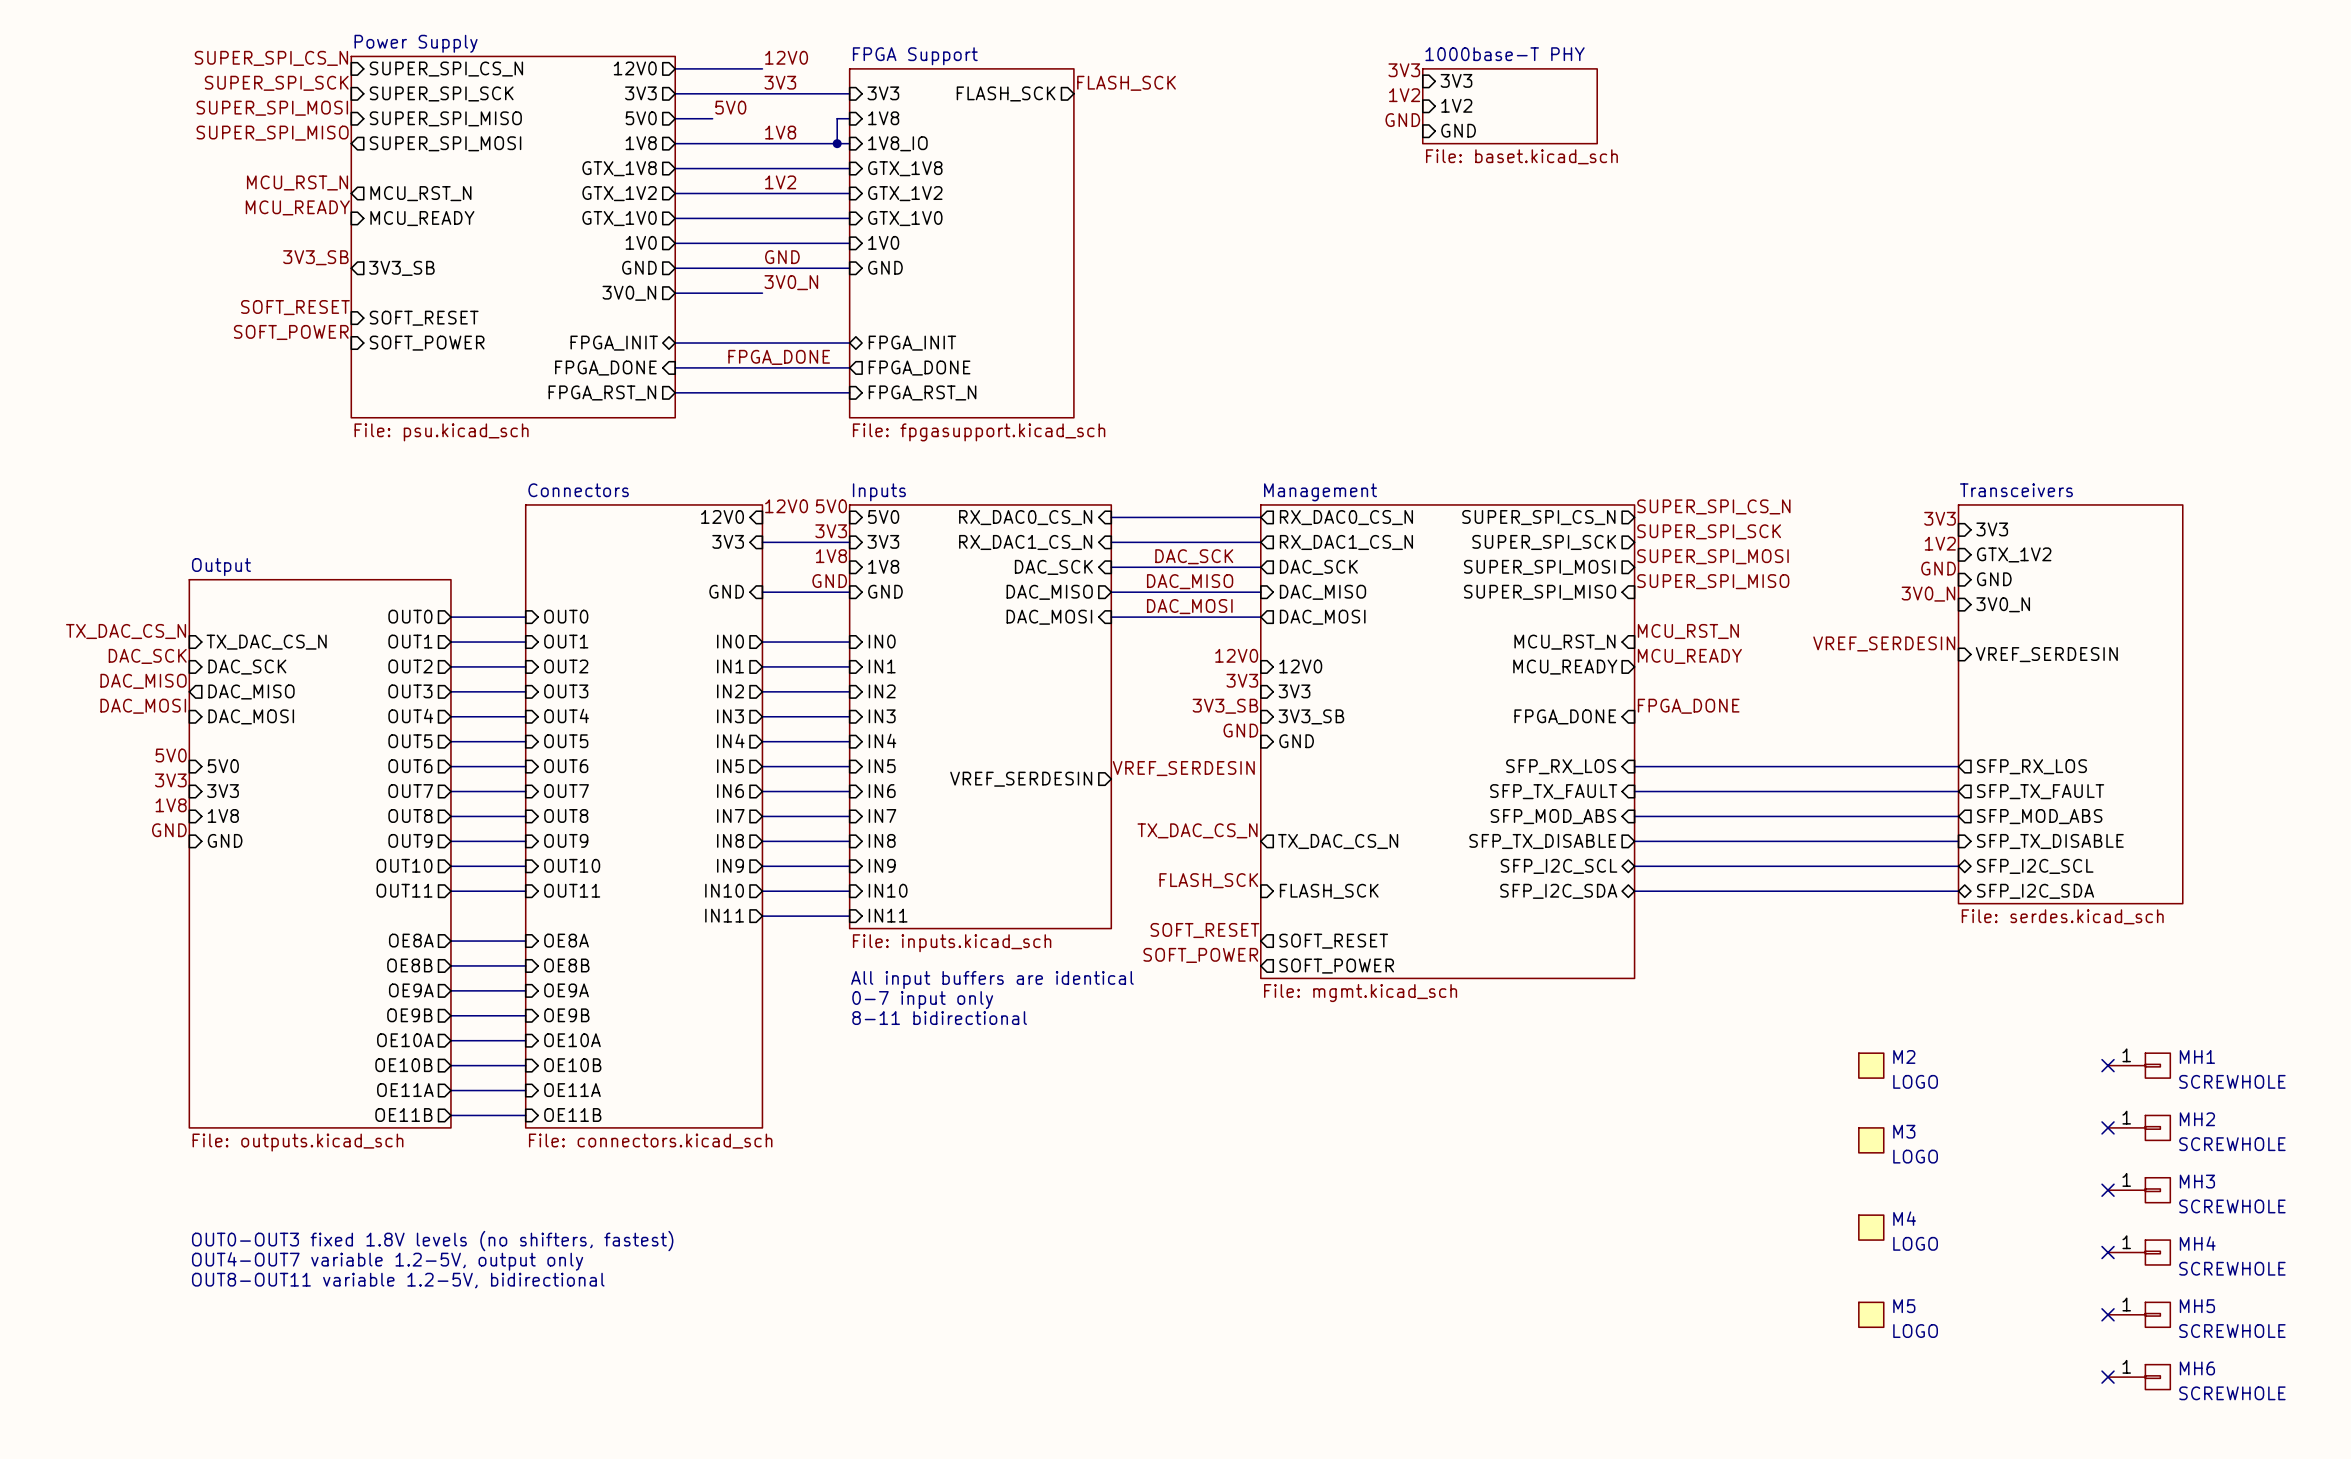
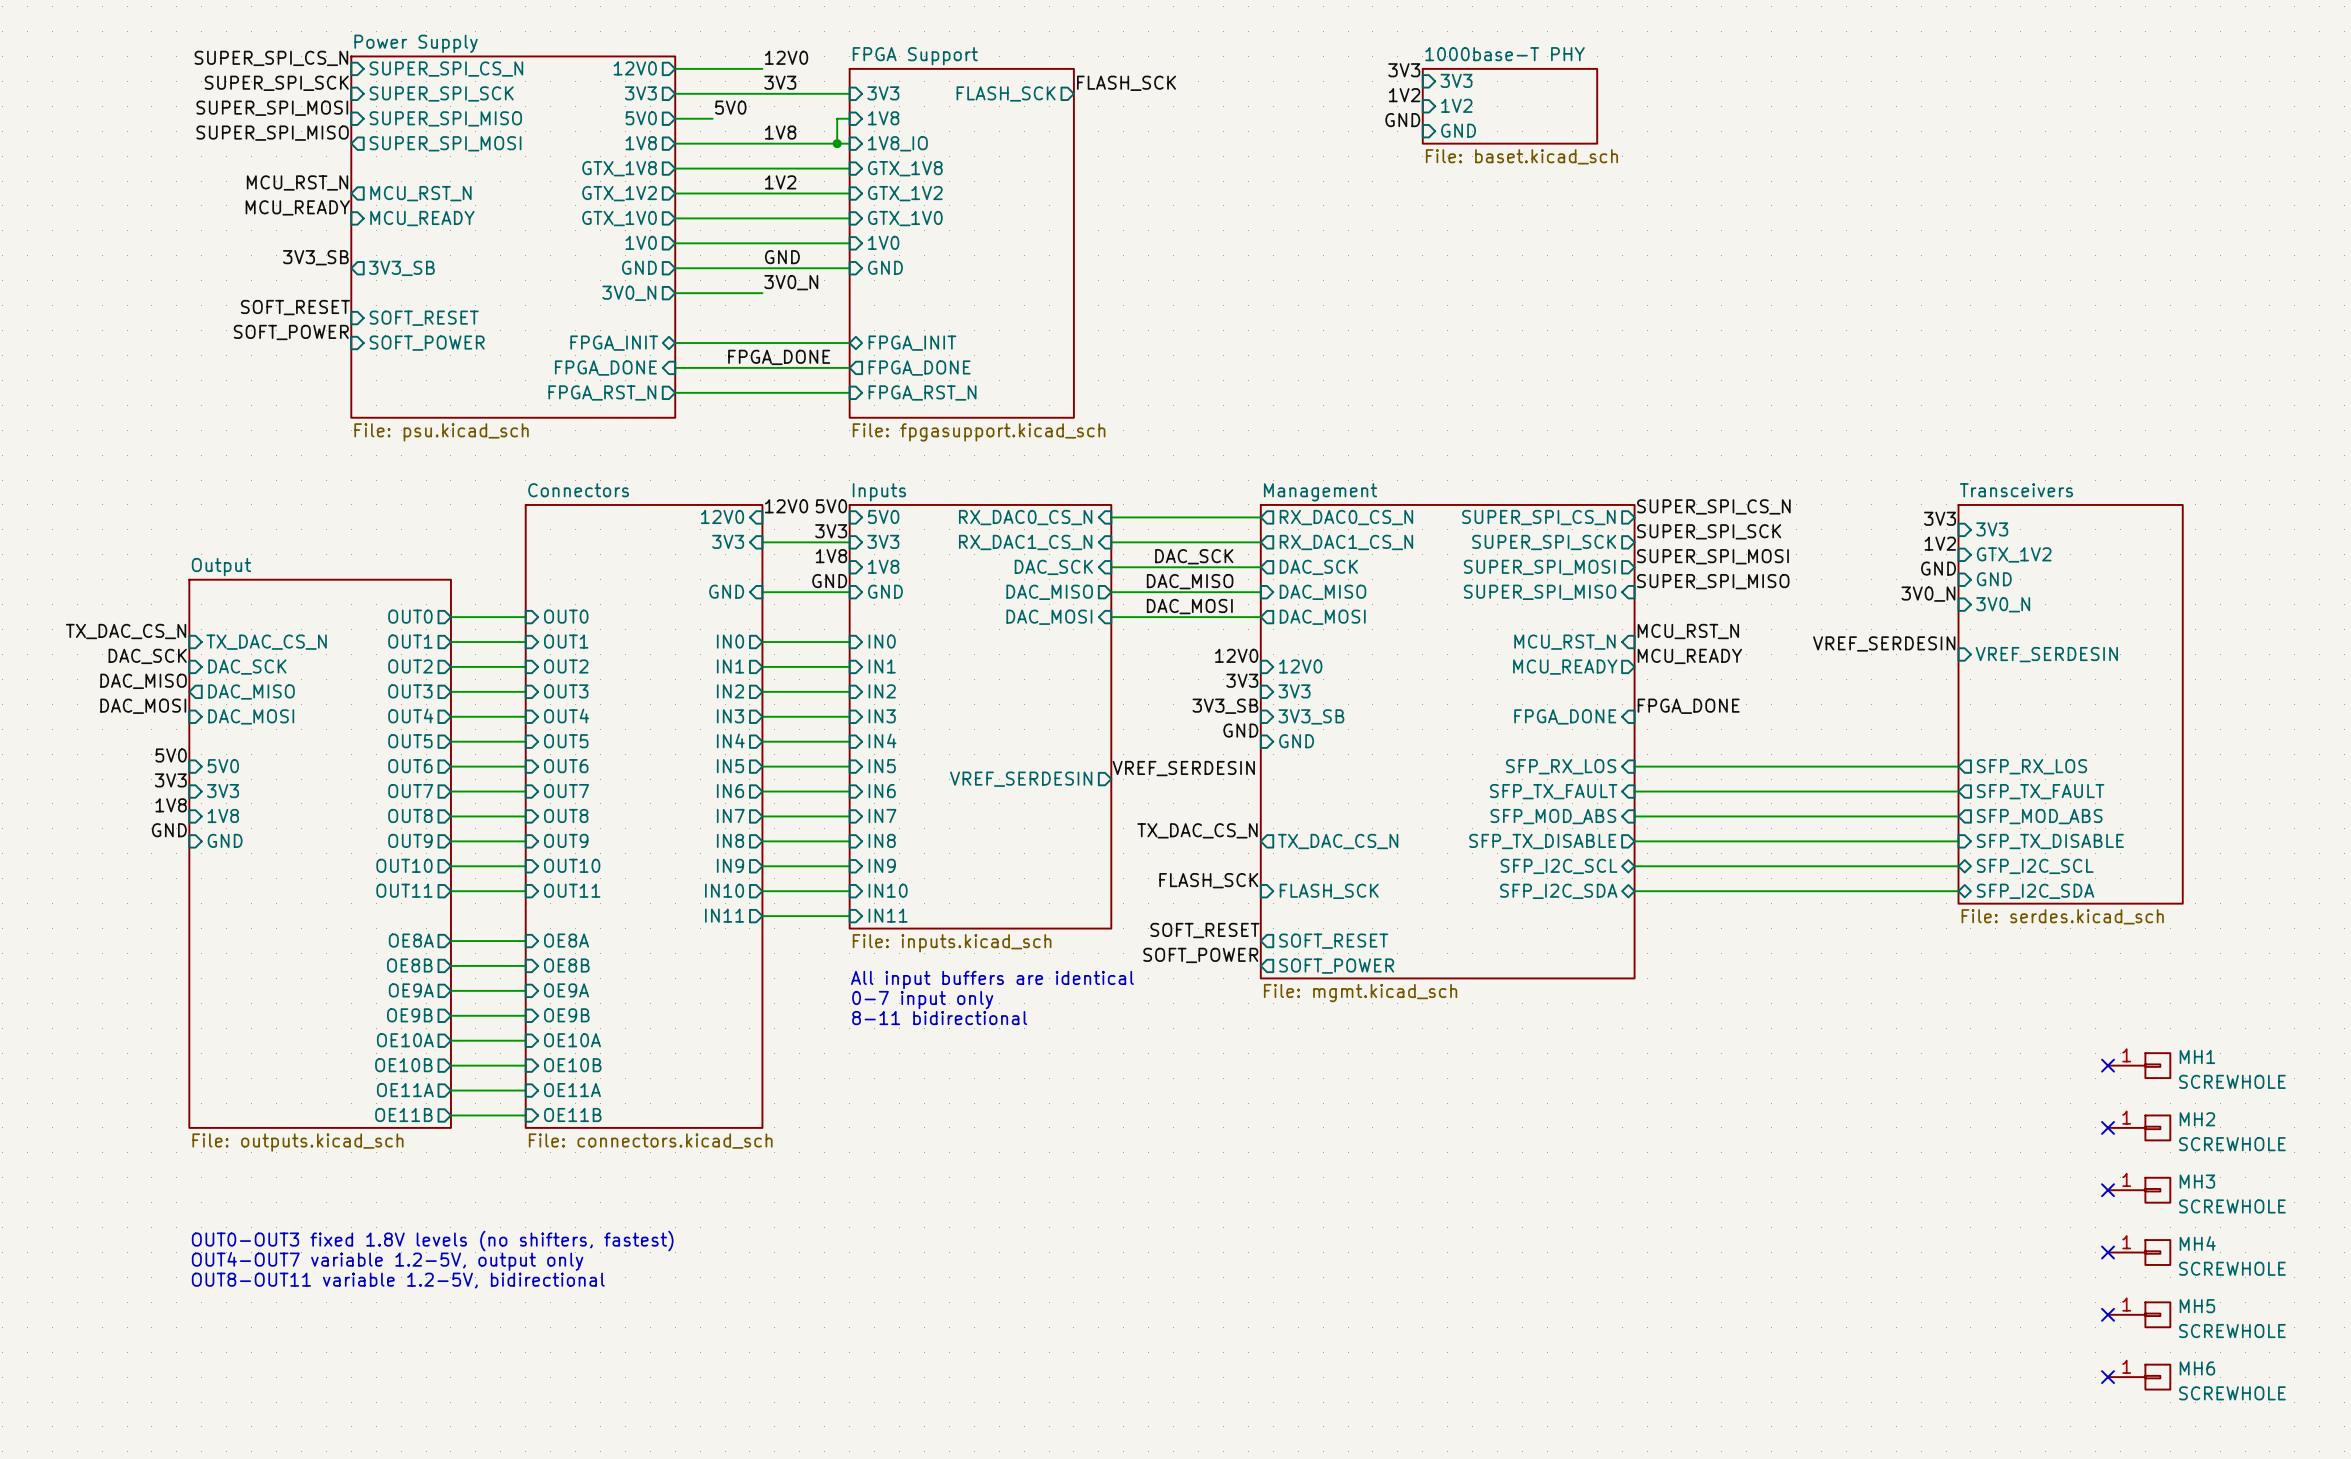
M2: LOGO (1871, 1065) -> none
M3: LOGO (1871, 1140) -> none
M4: LOGO (1871, 1227) -> none
M5: LOGO (1871, 1314) -> none

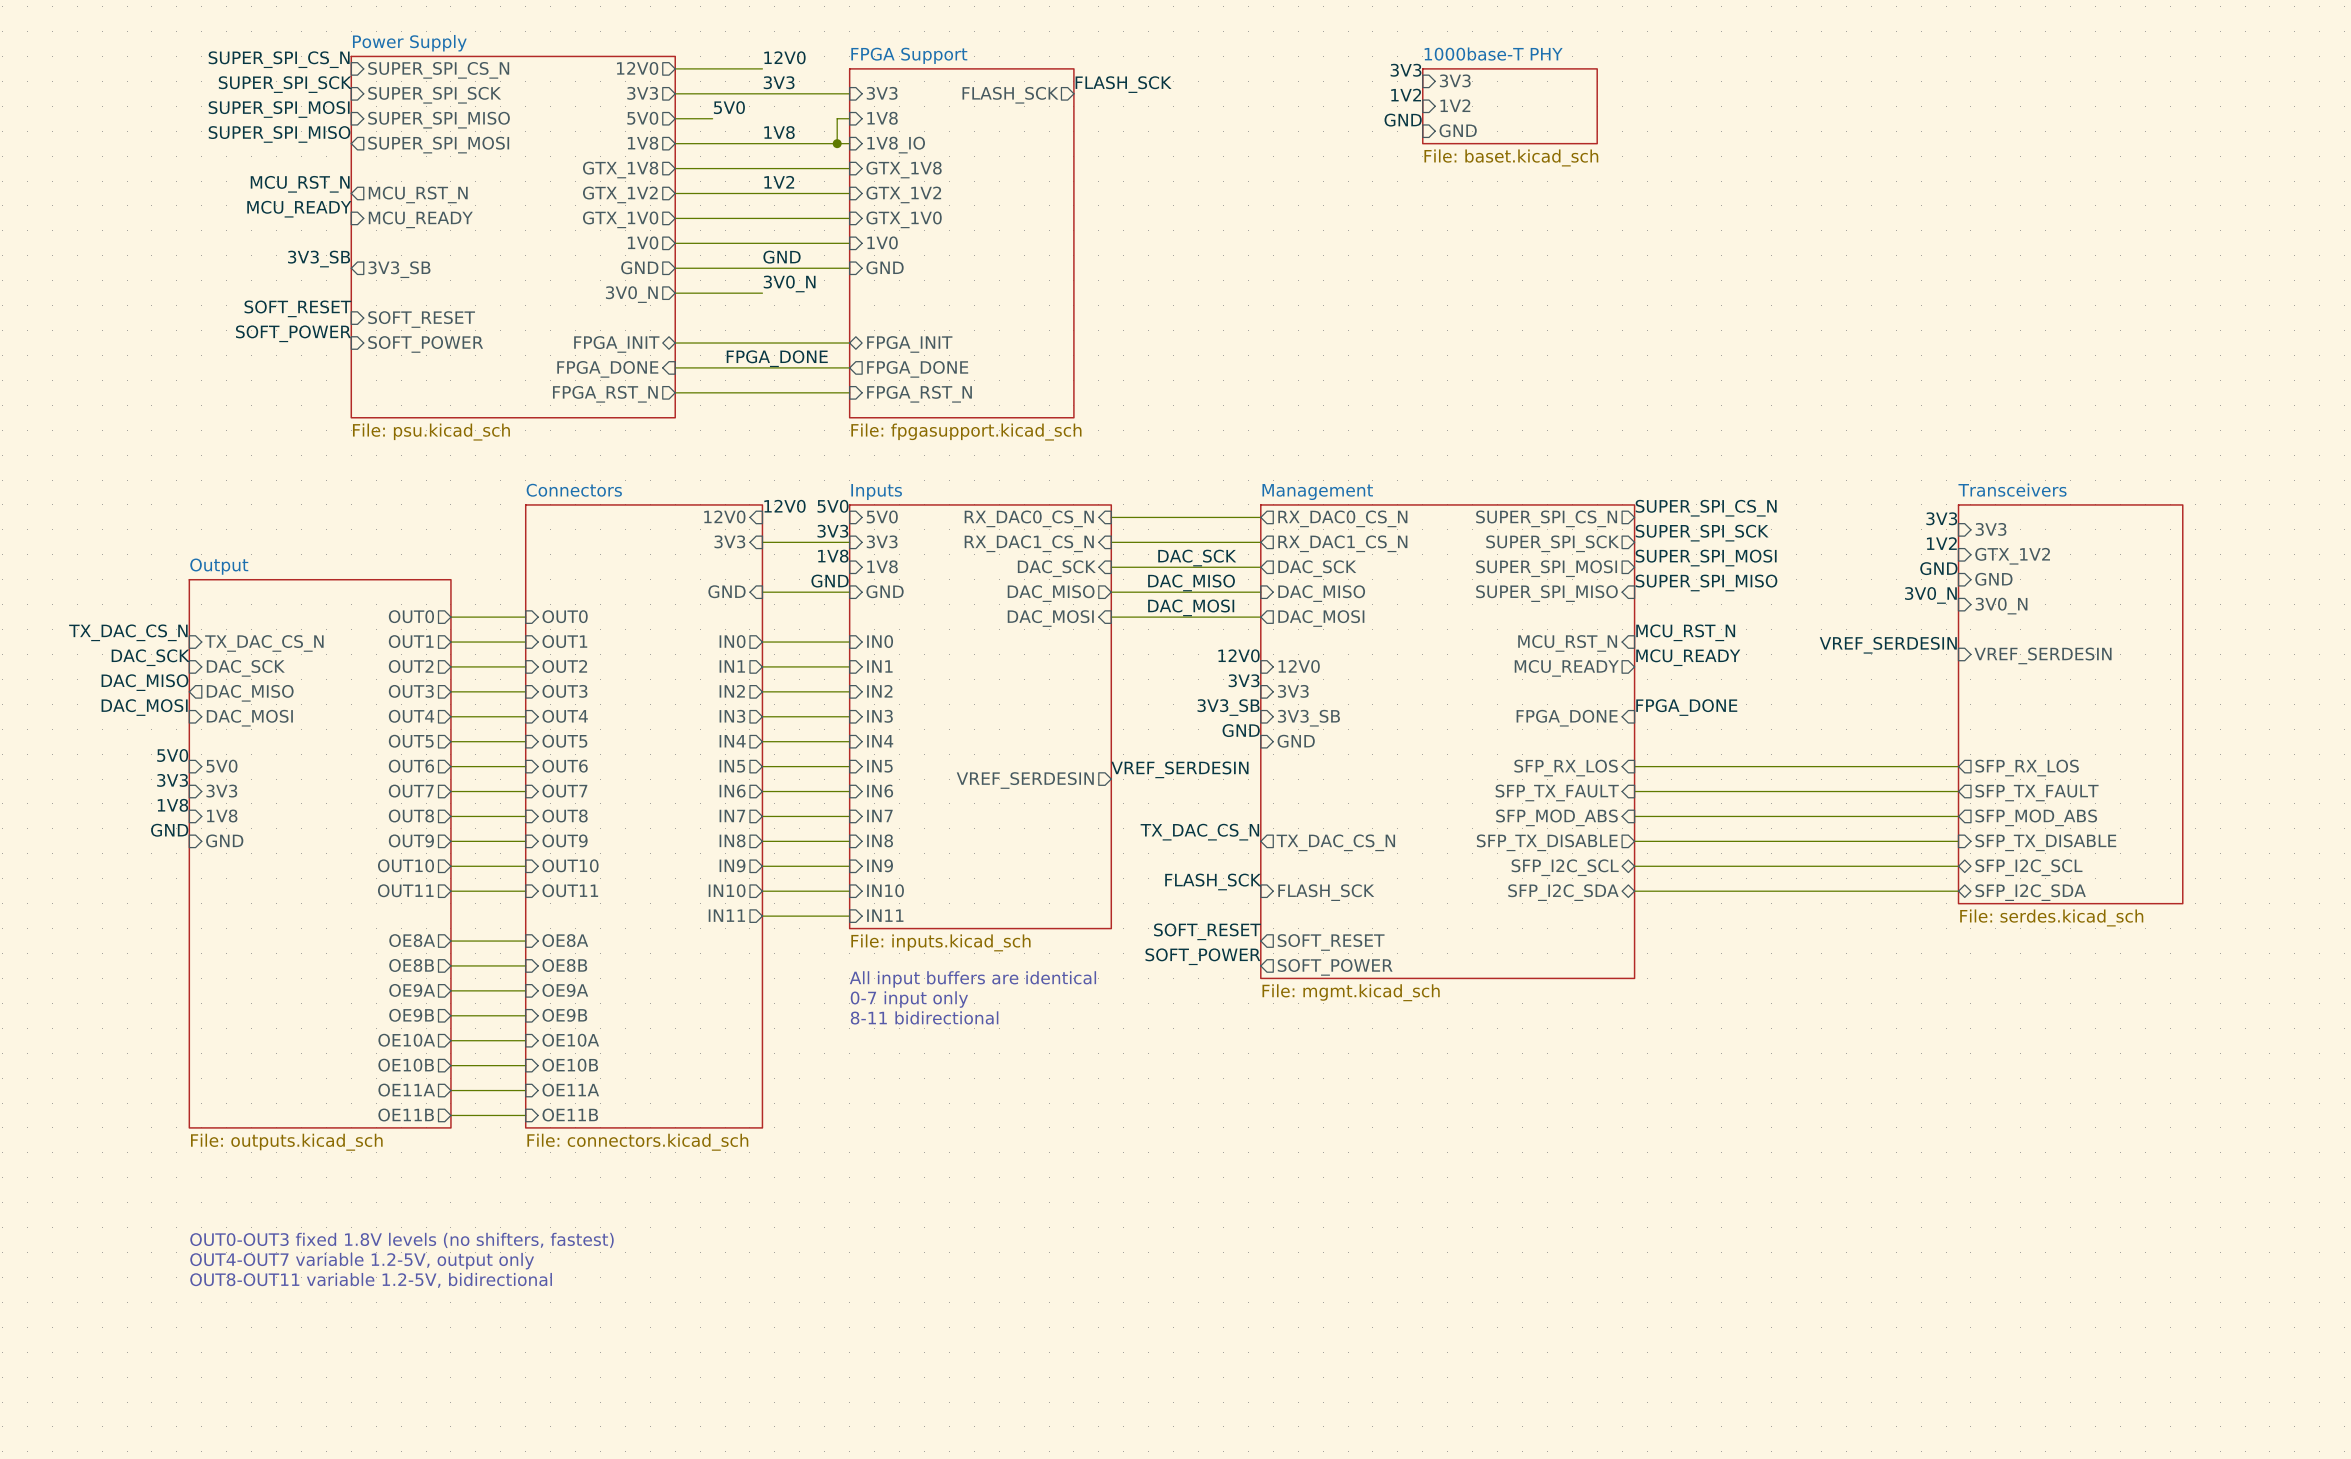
no-connect mark: (2108, 1065) -> none
MH1: SCREWHOLE (2139, 1065) -> none
no-connect mark: (2108, 1127) -> none
MH2: SCREWHOLE (2139, 1127) -> none
no-connect mark: (2108, 1190) -> none
MH3: SCREWHOLE (2139, 1190) -> none
no-connect mark: (2108, 1252) -> none
MH4: SCREWHOLE (2139, 1252) -> none
no-connect mark: (2108, 1314) -> none
MH5: SCREWHOLE (2139, 1314) -> none
no-connect mark: (2108, 1377) -> none
MH6: SCREWHOLE (2139, 1377) -> none

